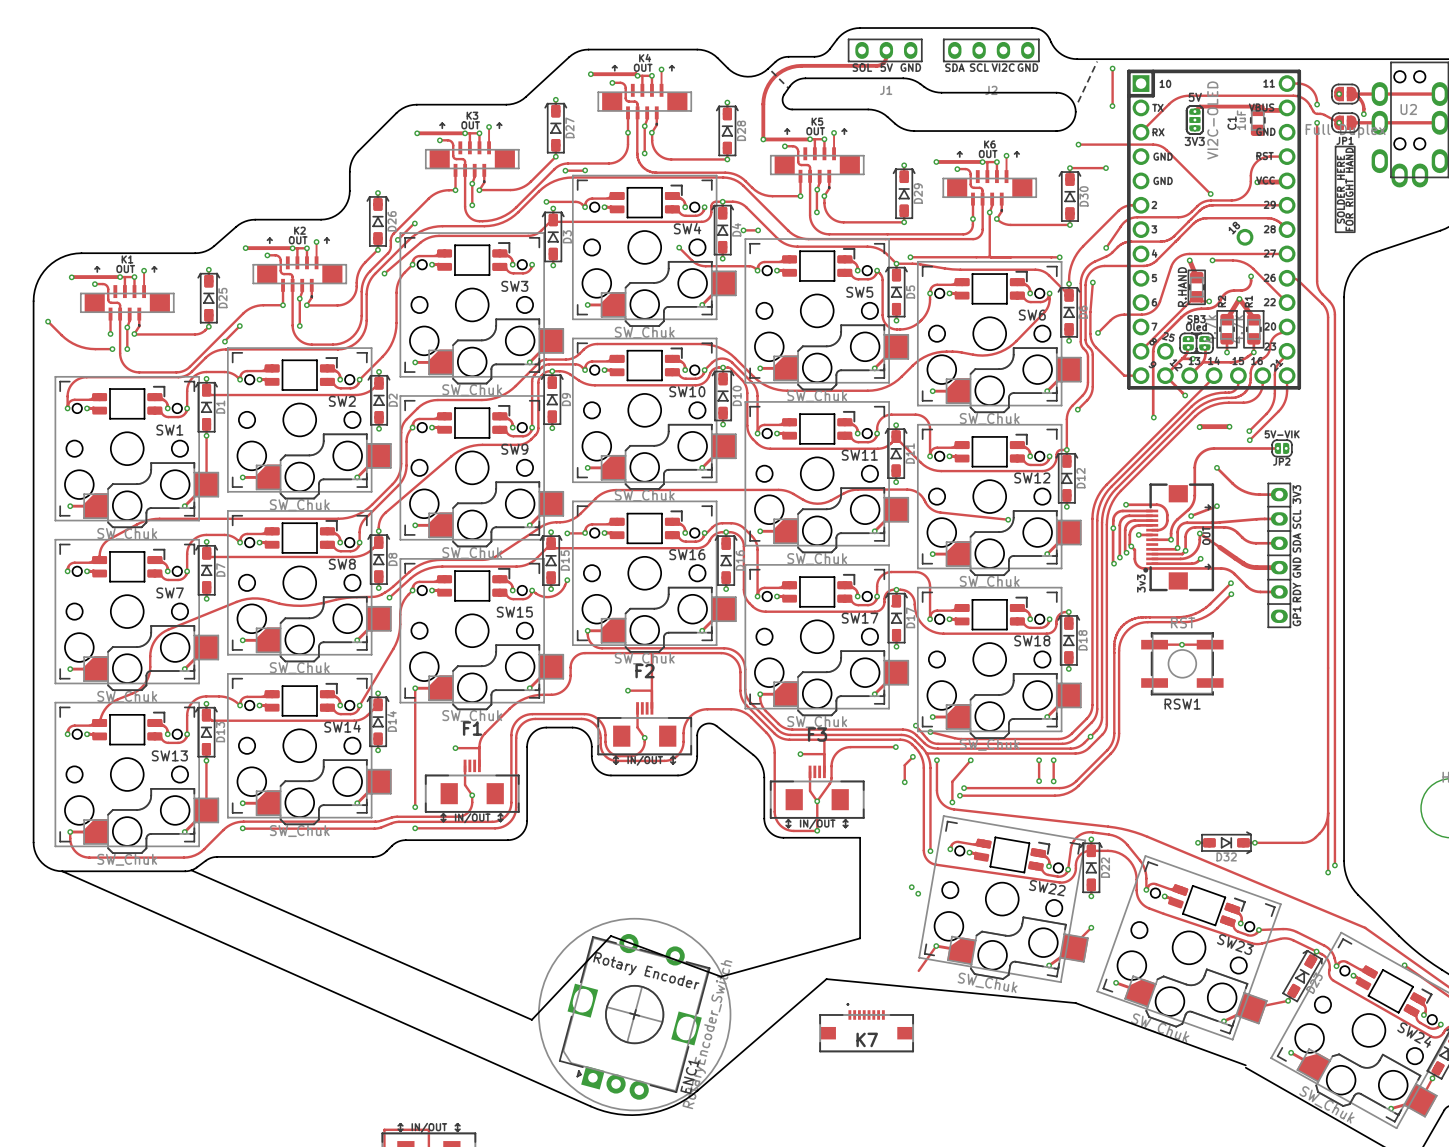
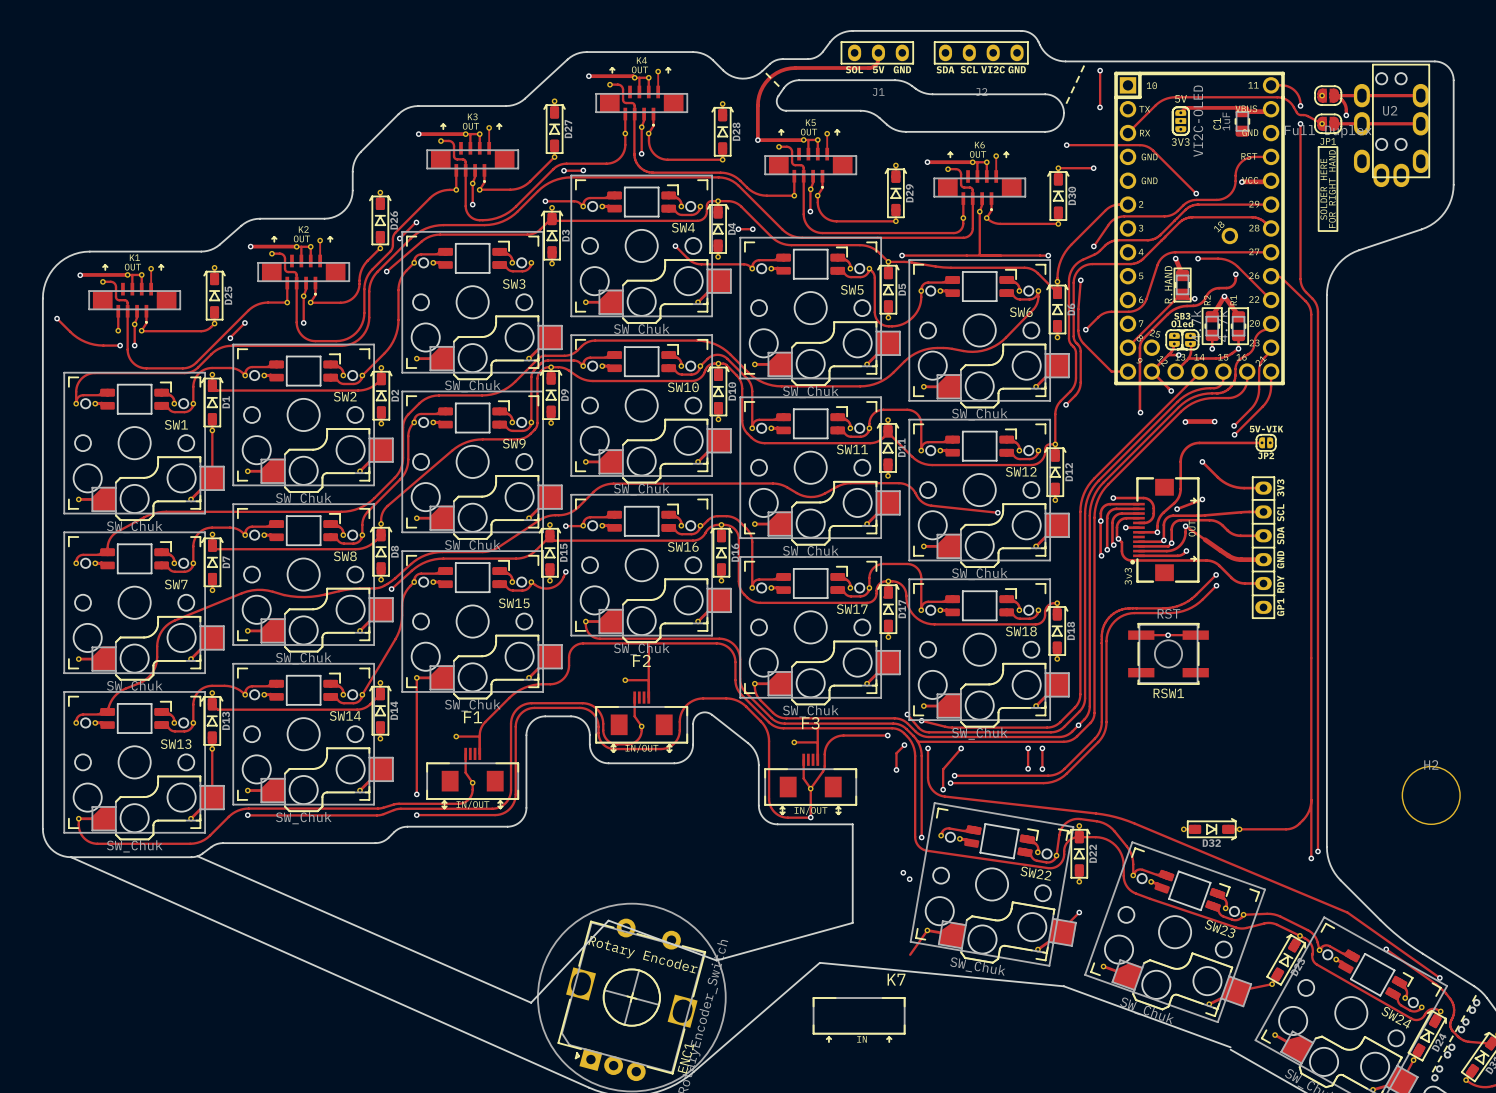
K7 footprint: [819, 1003, 915, 1053] -> [812, 997, 906, 1043]
K7 name position: K7 (867, 1039) -> K7 (896, 979)

